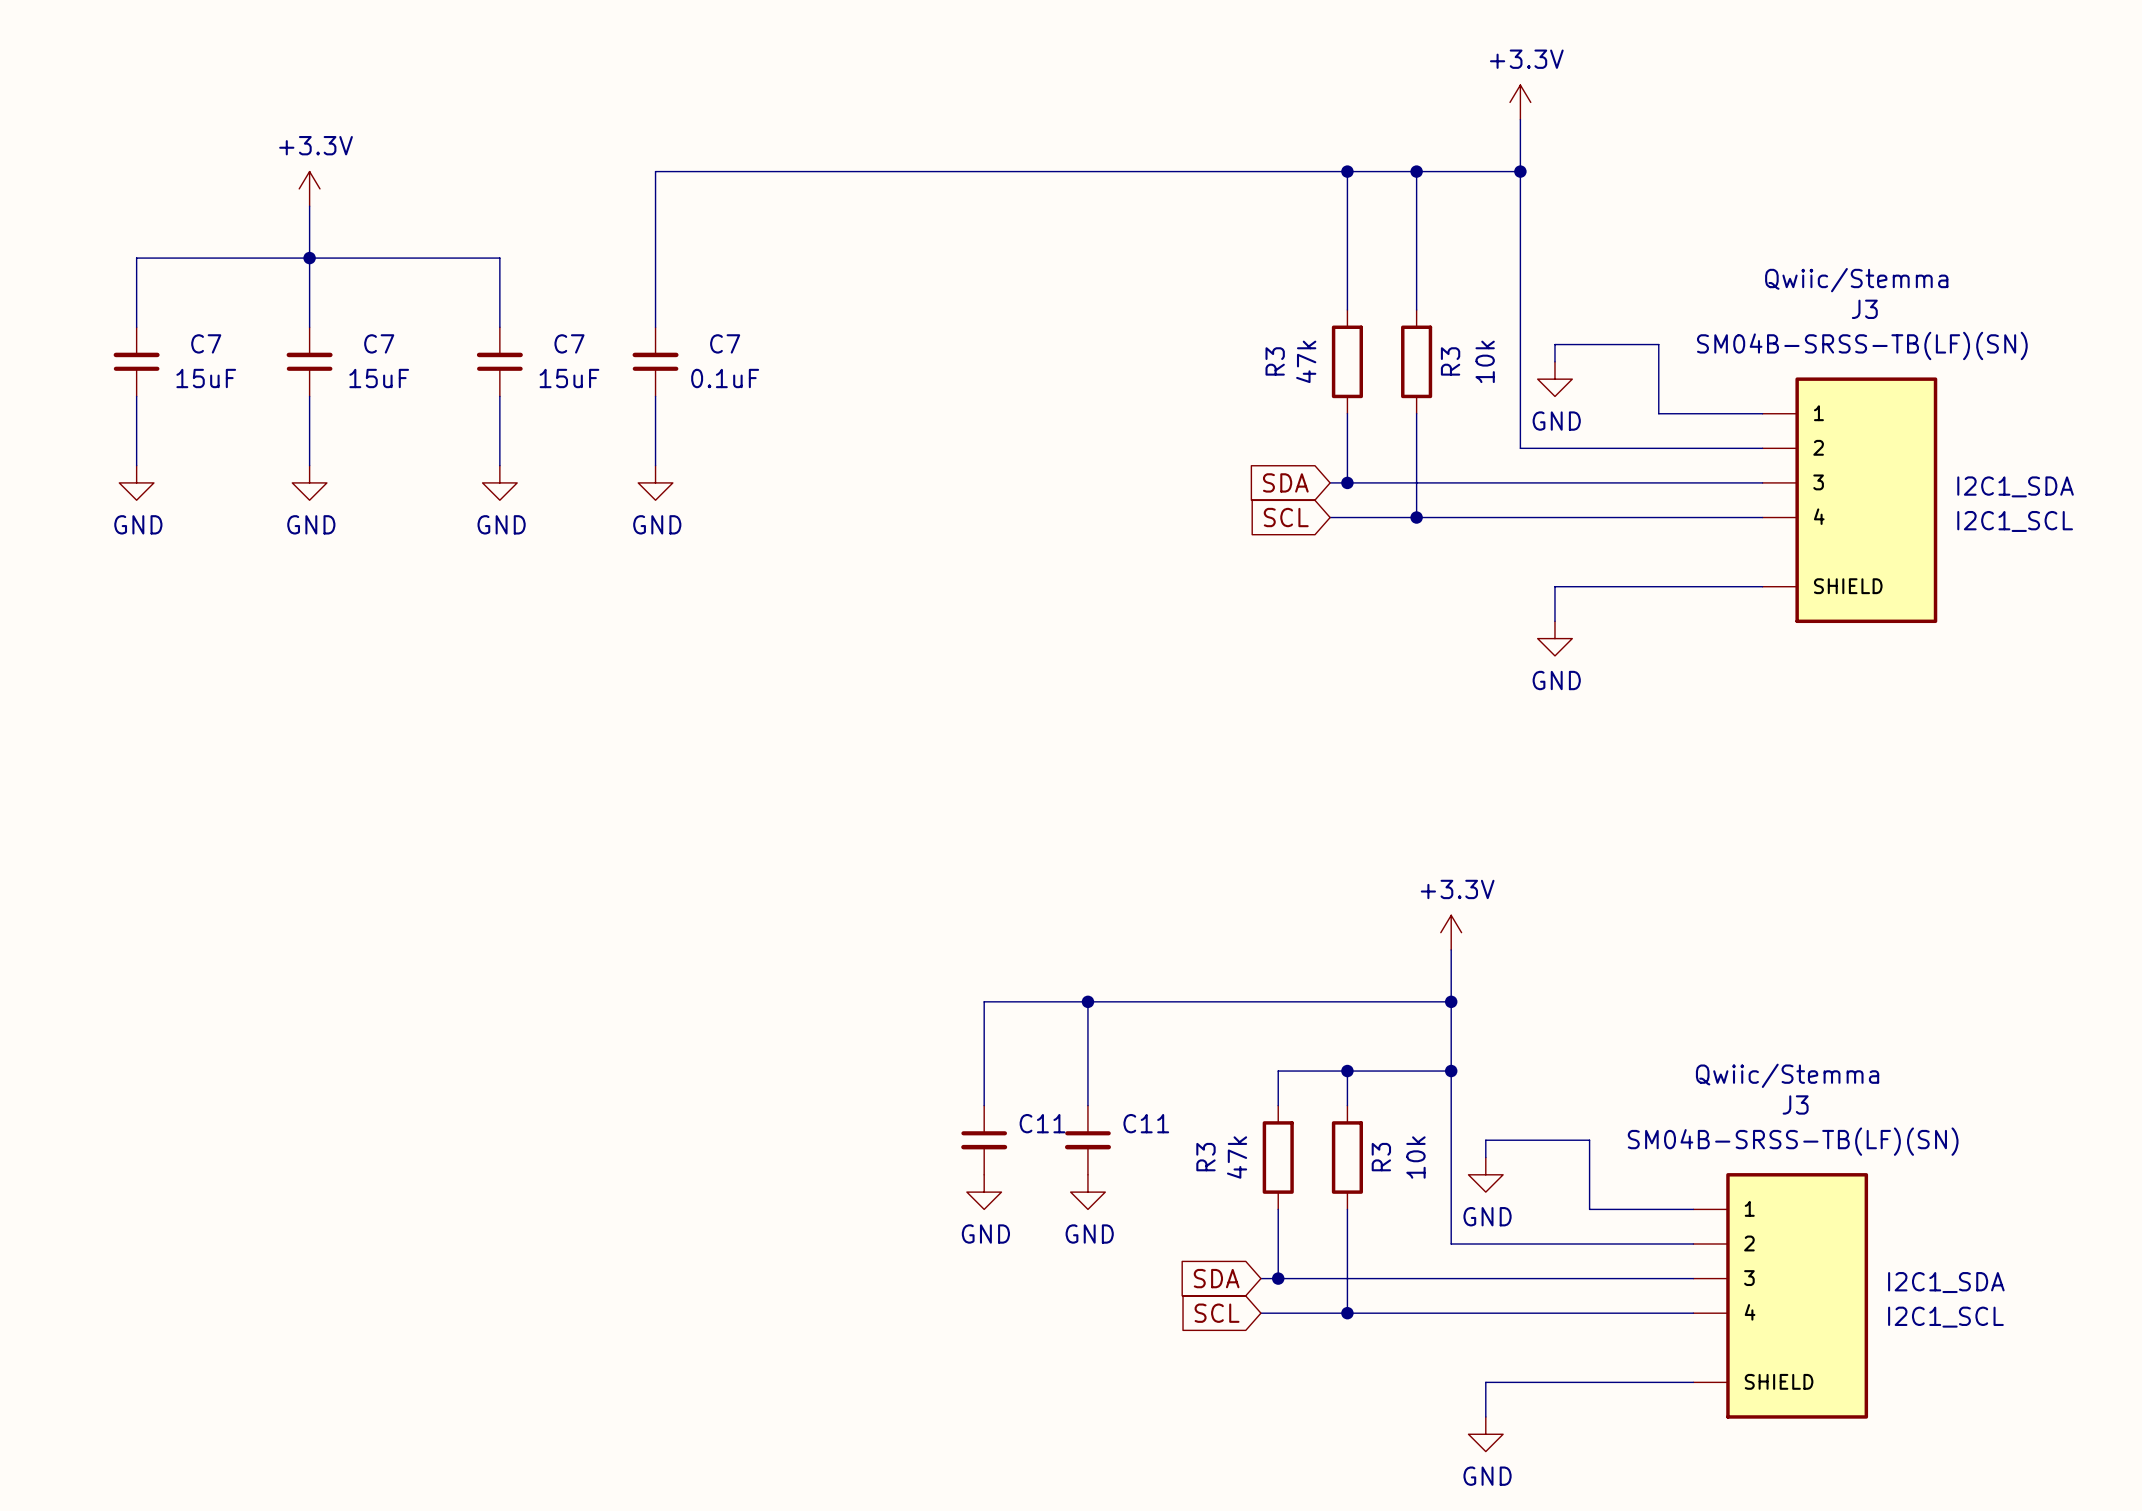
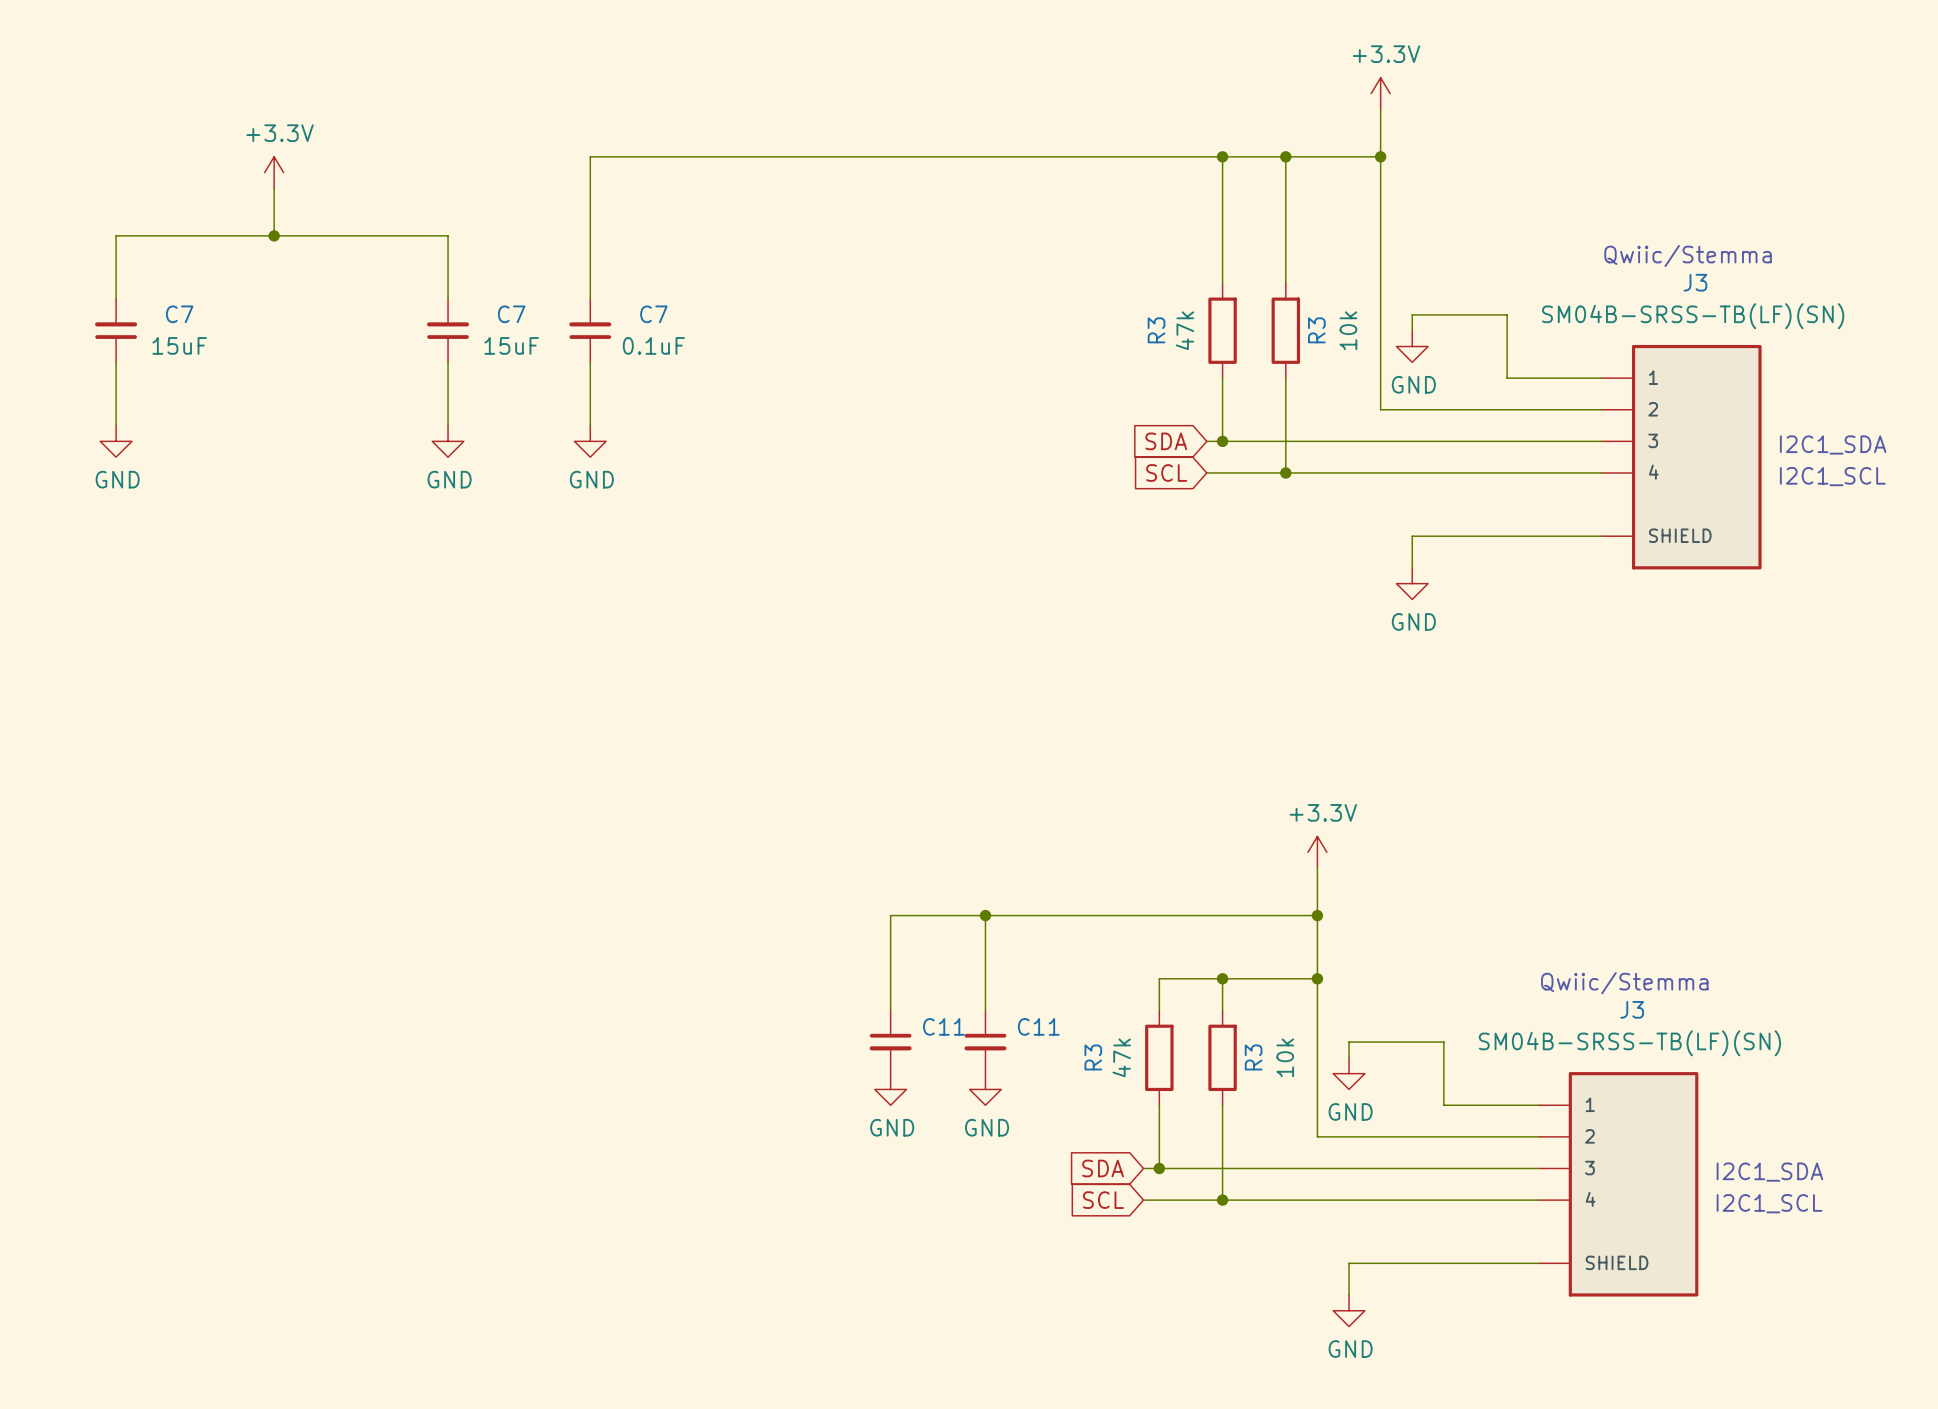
wire: (309, 258) (309, 327) -> none
C7: 15uF (309, 361) -> none
wire: (309, 396) (309, 465) -> none
power symbol: GND (309, 482) -> none

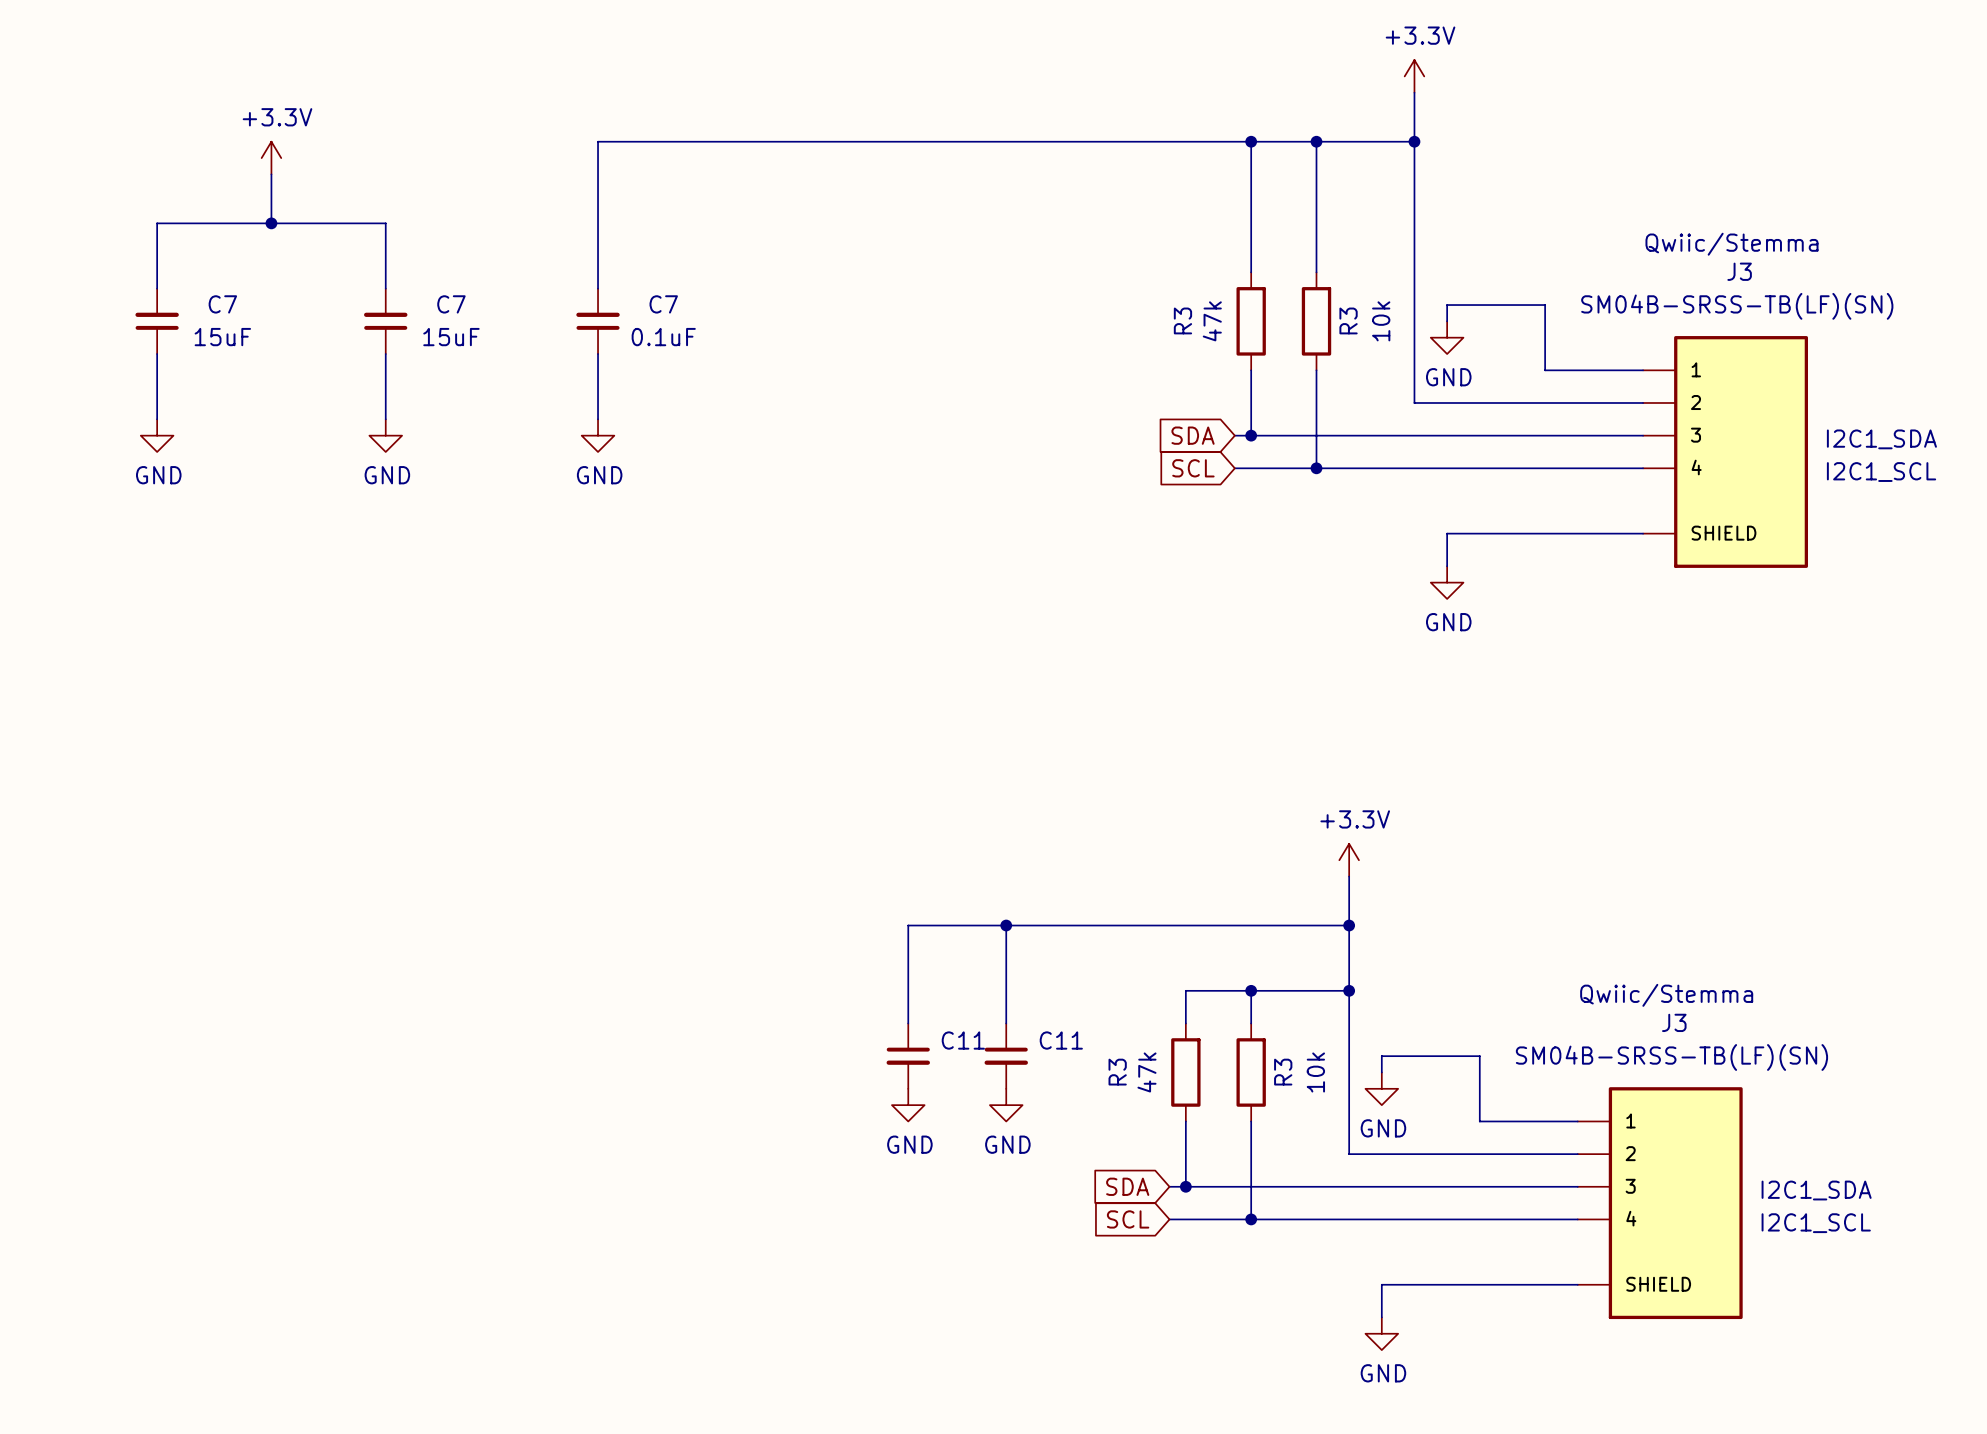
wire: (163, 235) (116, 235) (116, 299) -> (157, 223) (157, 288)
wire: (384, 235) (448, 235) (448, 299) -> (385, 223) (385, 288)
C7 position: (116, 330) -> (157, 321)
C7 position: (448, 330) -> (385, 321)
wire: (116, 362) (116, 425) -> (157, 354) (157, 419)
wire: (448, 362) (448, 425) -> (385, 354) (385, 419)
power symbol position: GND (116, 441) -> GND (157, 435)
power symbol position: GND (448, 441) -> GND (385, 435)

